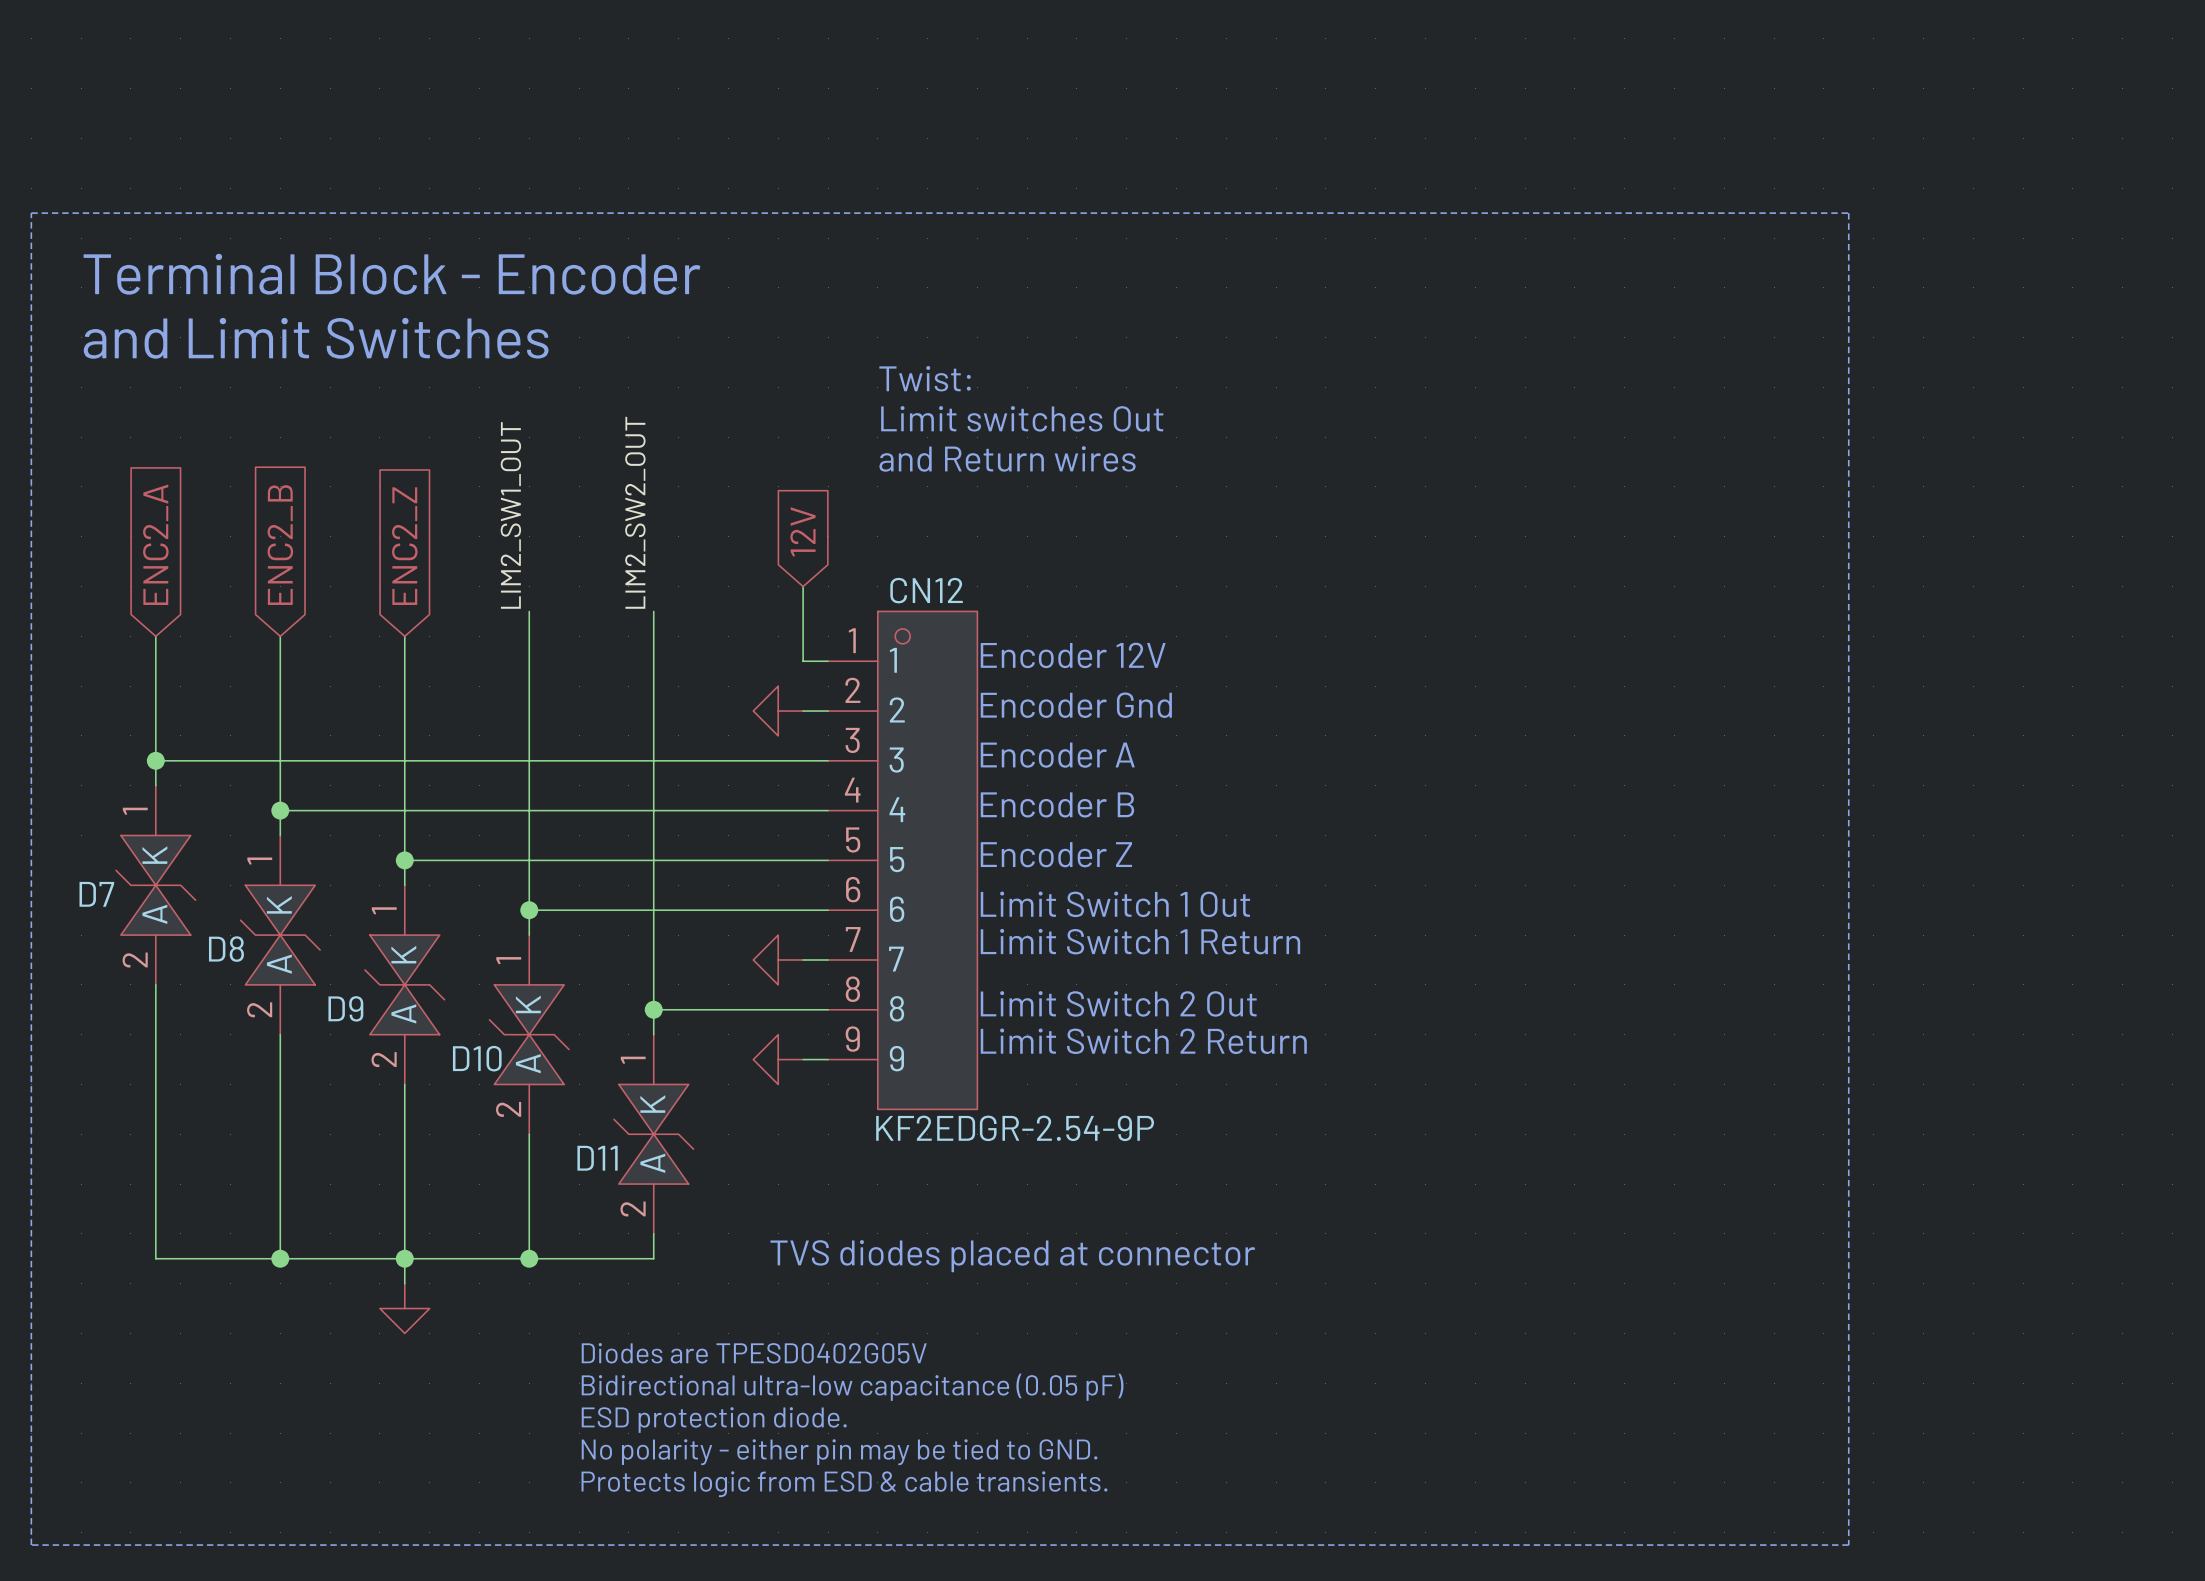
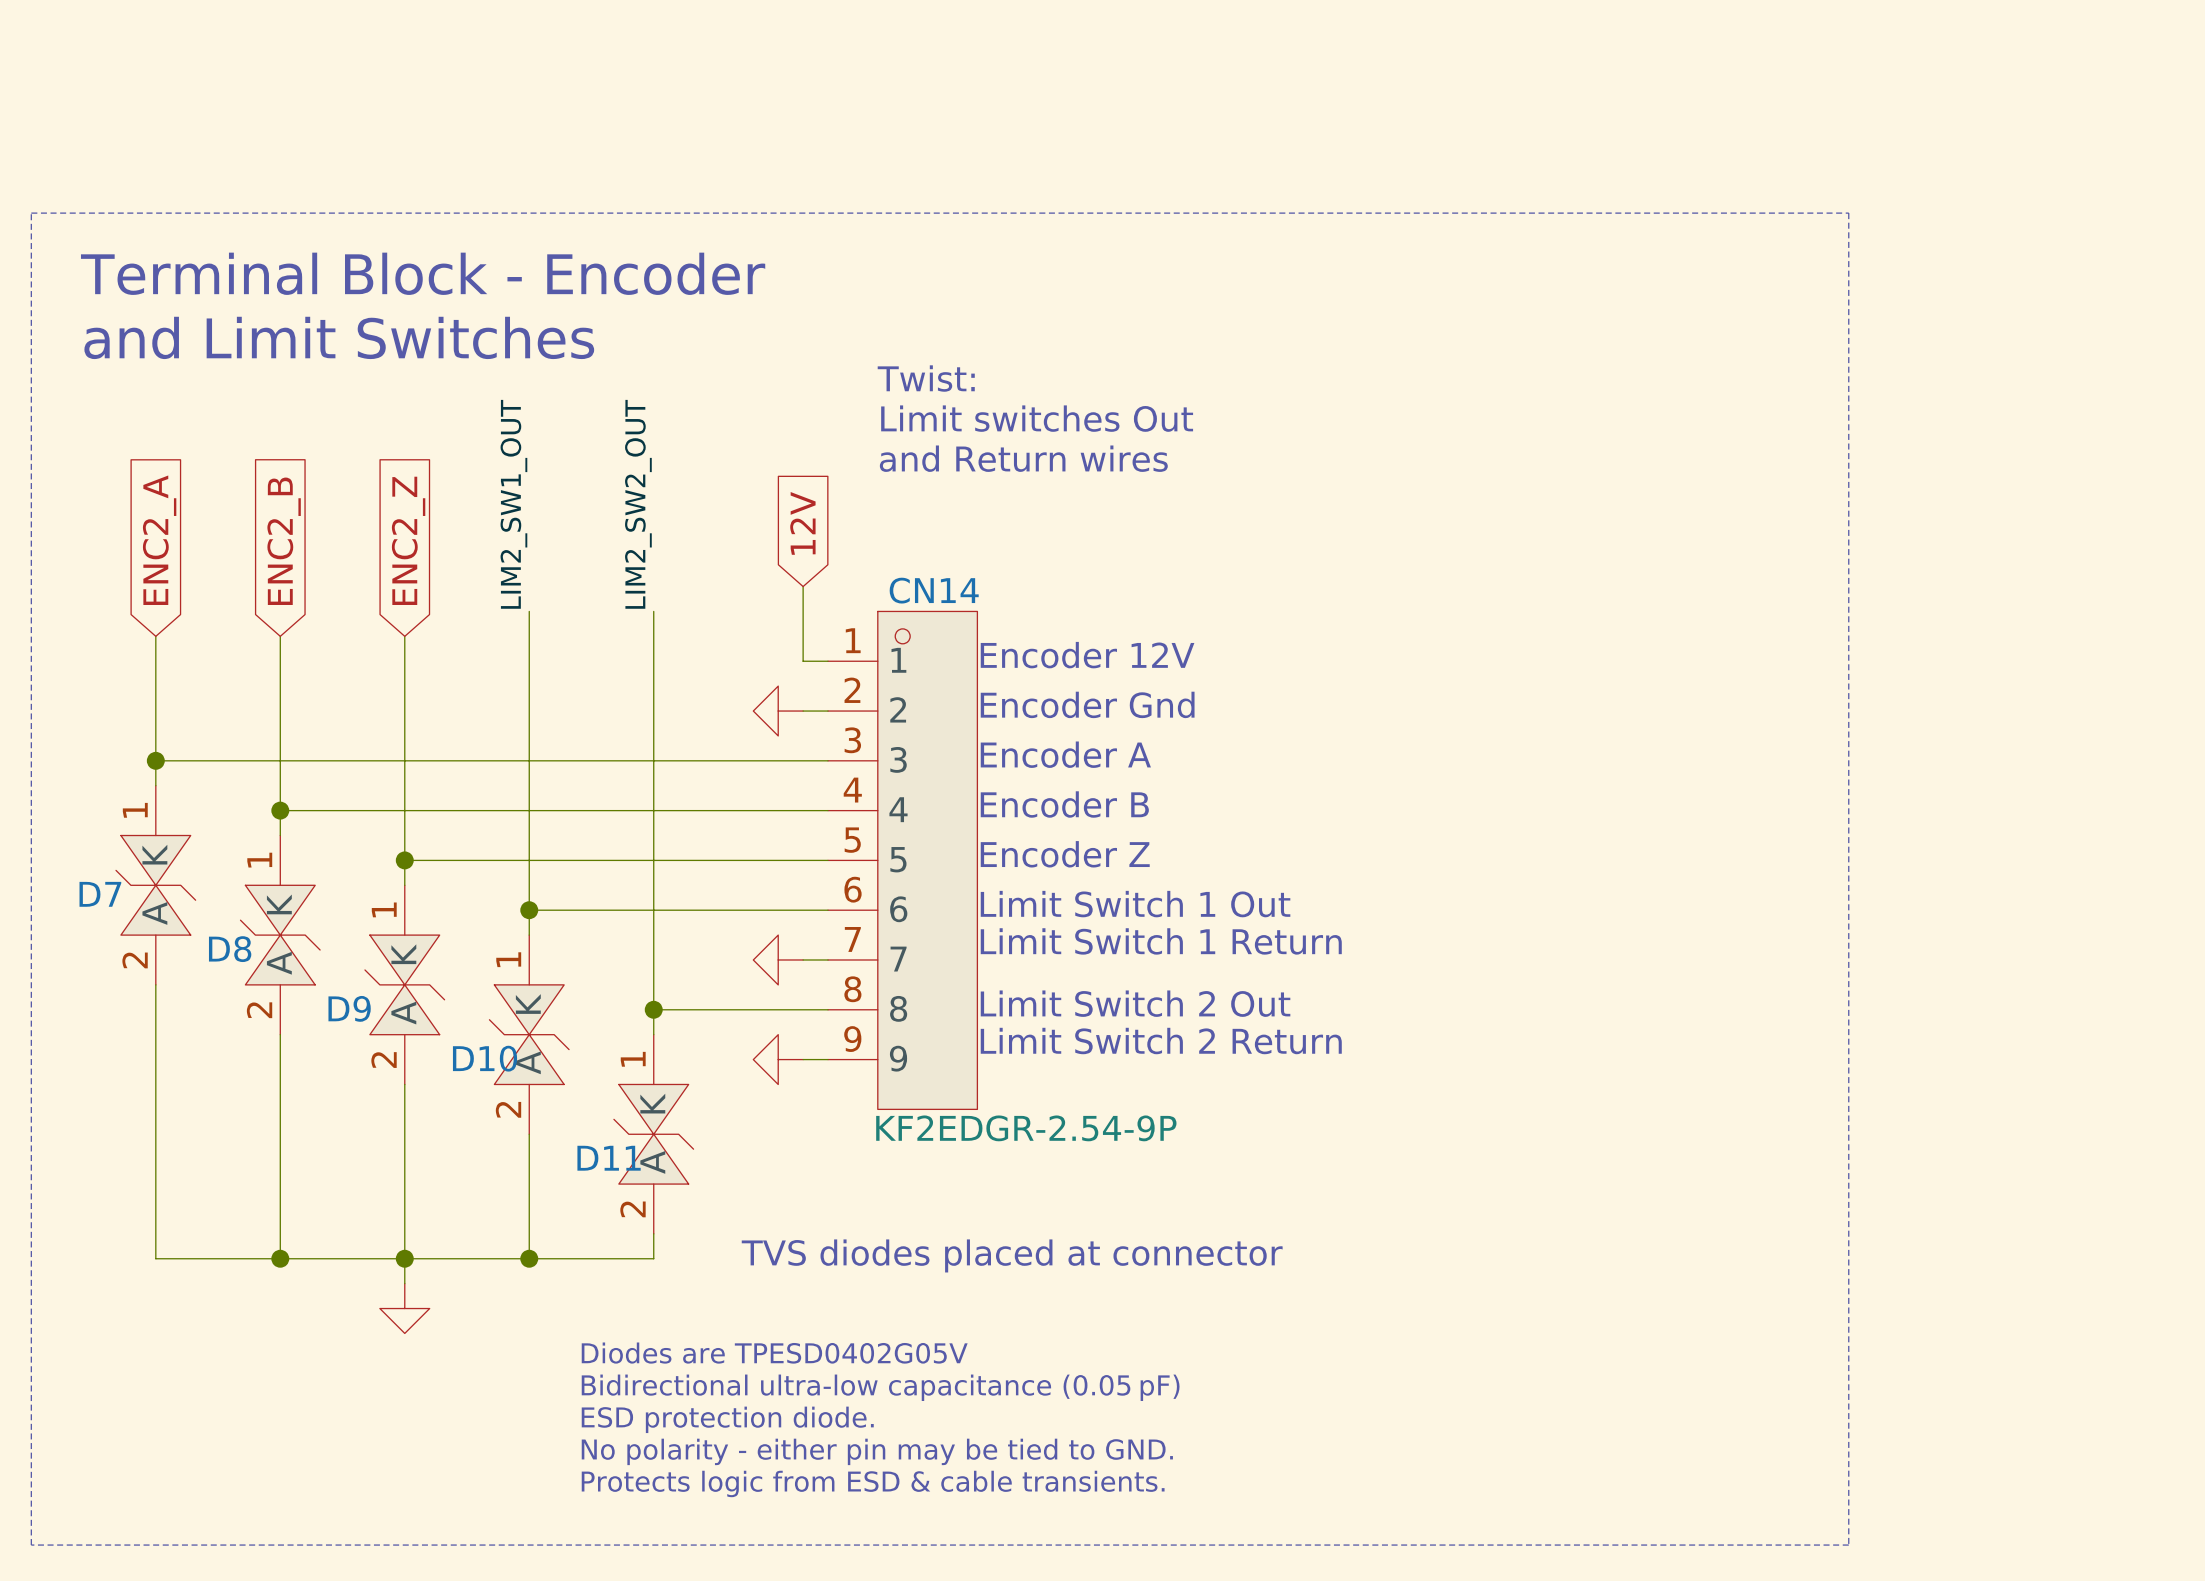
CN12 name: CN12 (926, 590) -> CN14 (934, 590)

